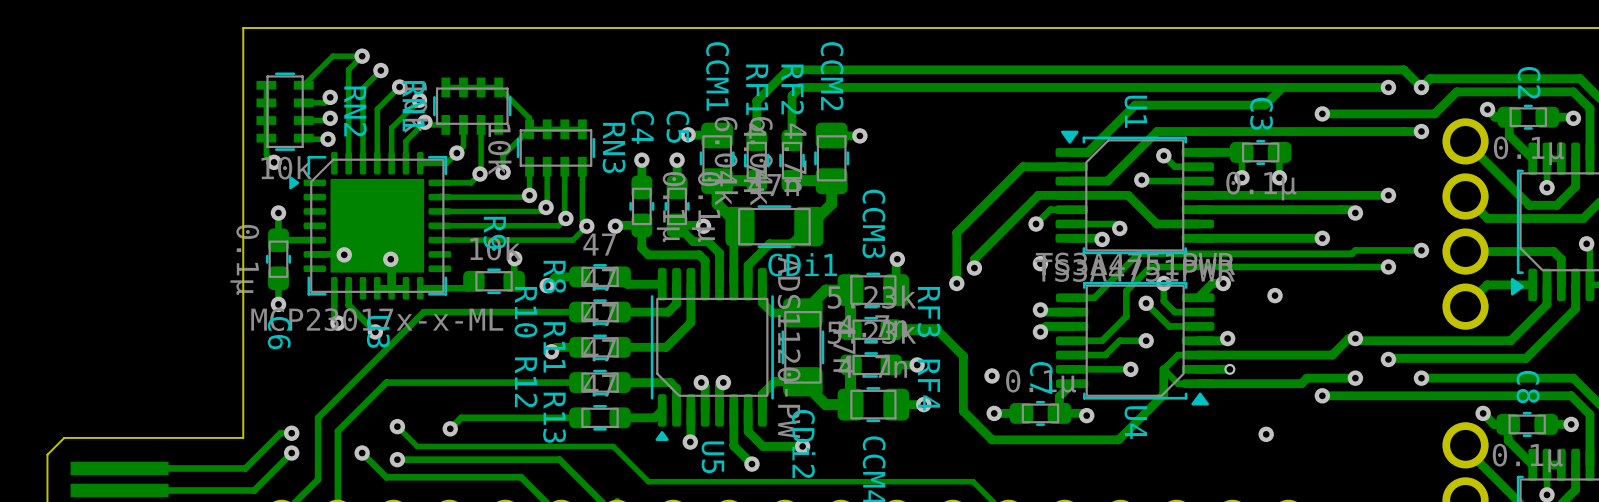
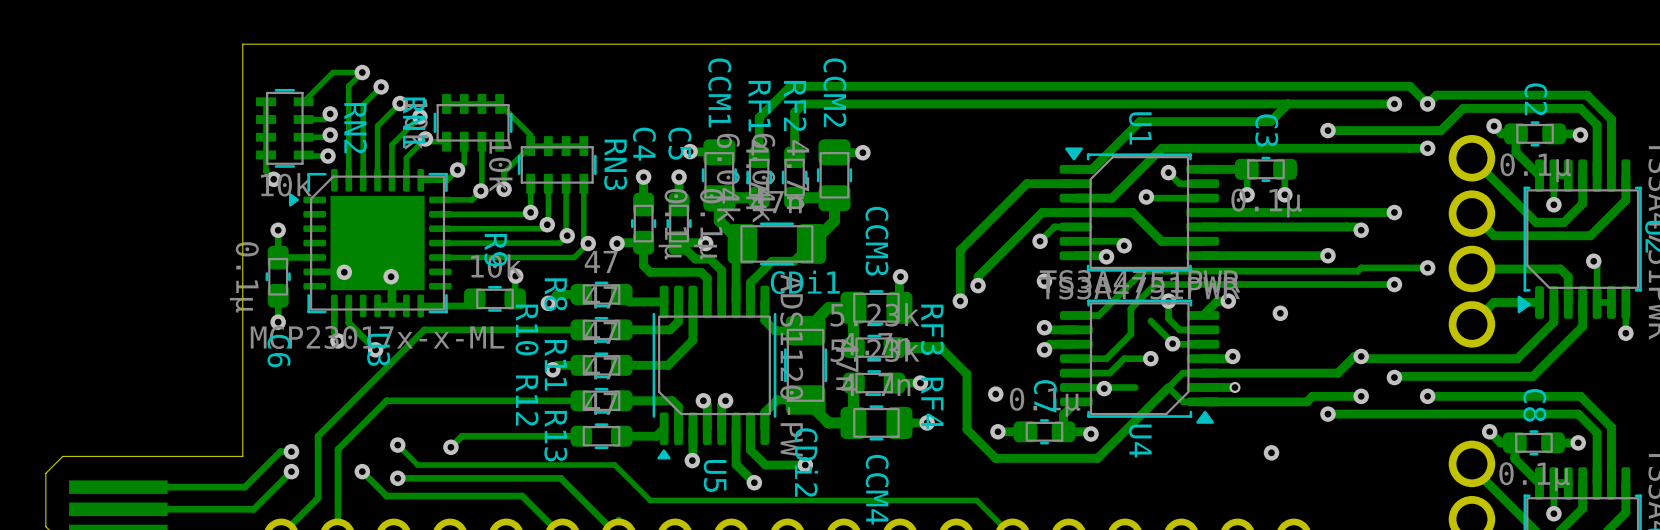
via: (1146, 303) -> none
via: none -> (1172, 343)
via: (1130, 369) -> none
track: (1163, 369) (1163, 394) (1118, 439) (1093, 439) -> (1168, 387) (1097, 458)
via: none -> (1104, 388)

